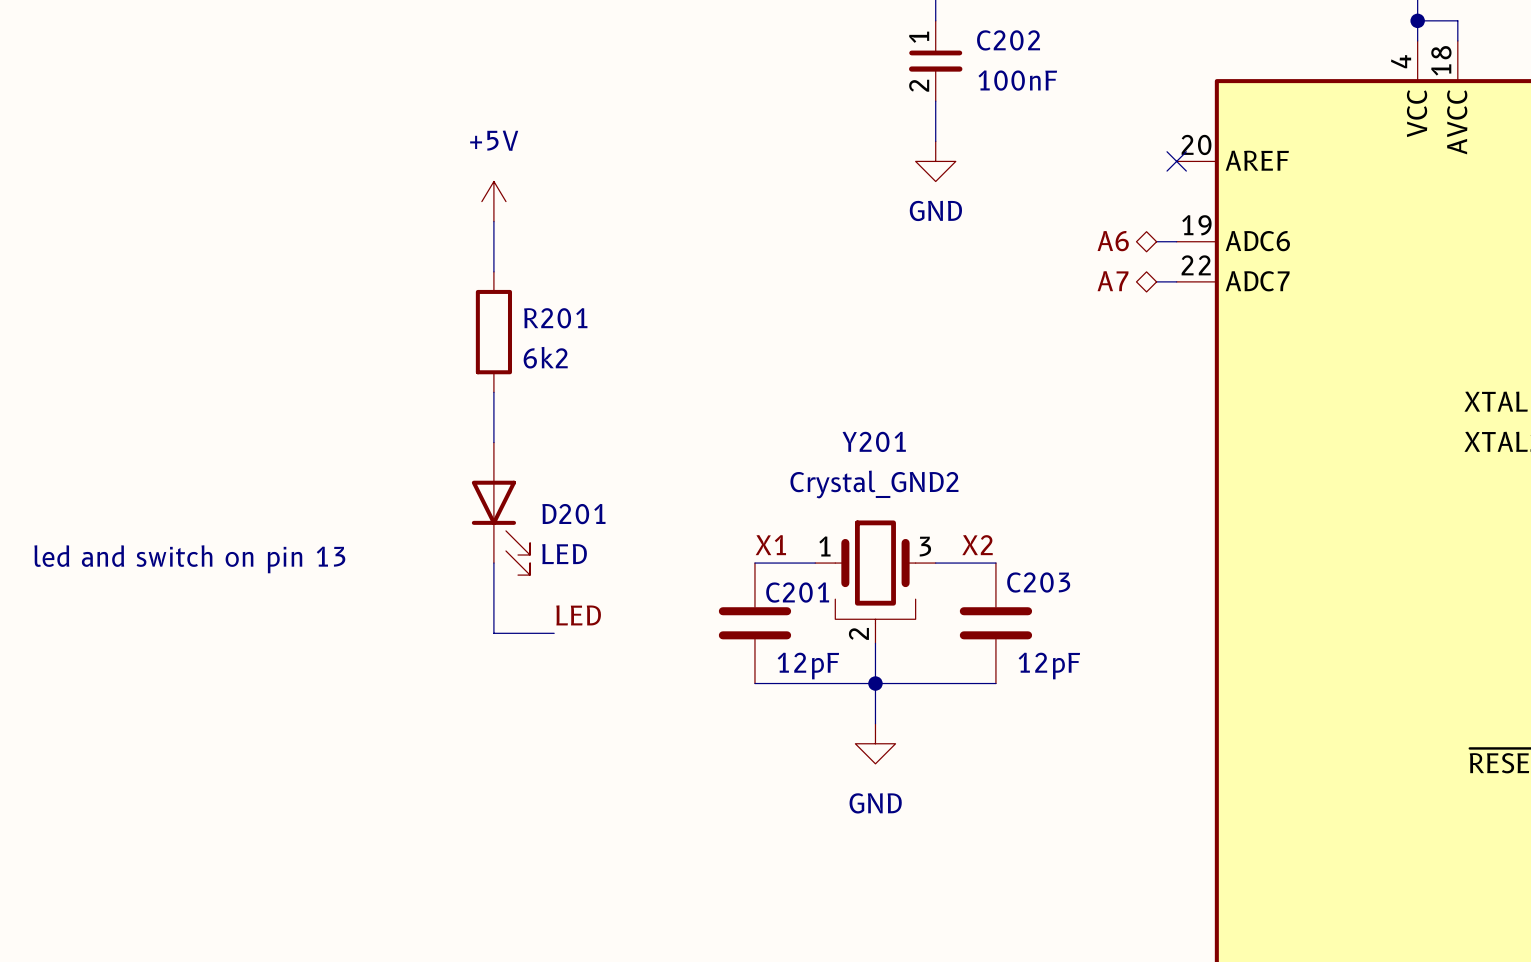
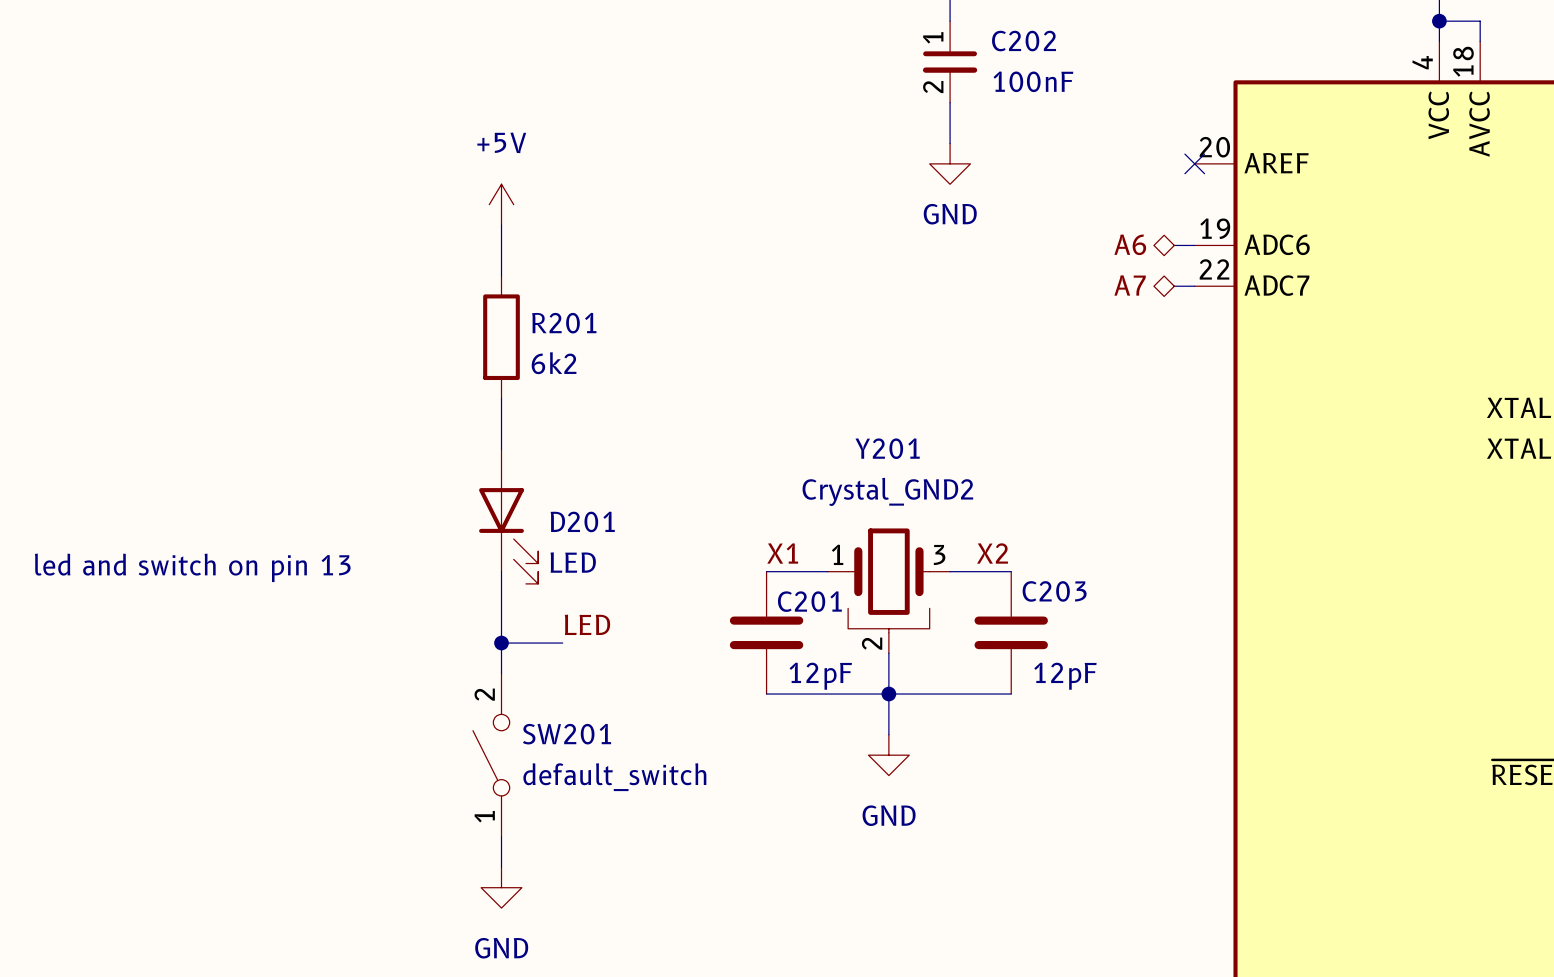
wire: none -> (501, 643) (501, 673)
junction: none -> (501, 643)
SW201: none -> default_switch (491, 755)
wire: none -> (501, 836) (501, 867)
power symbol: none -> GND (501, 887)

